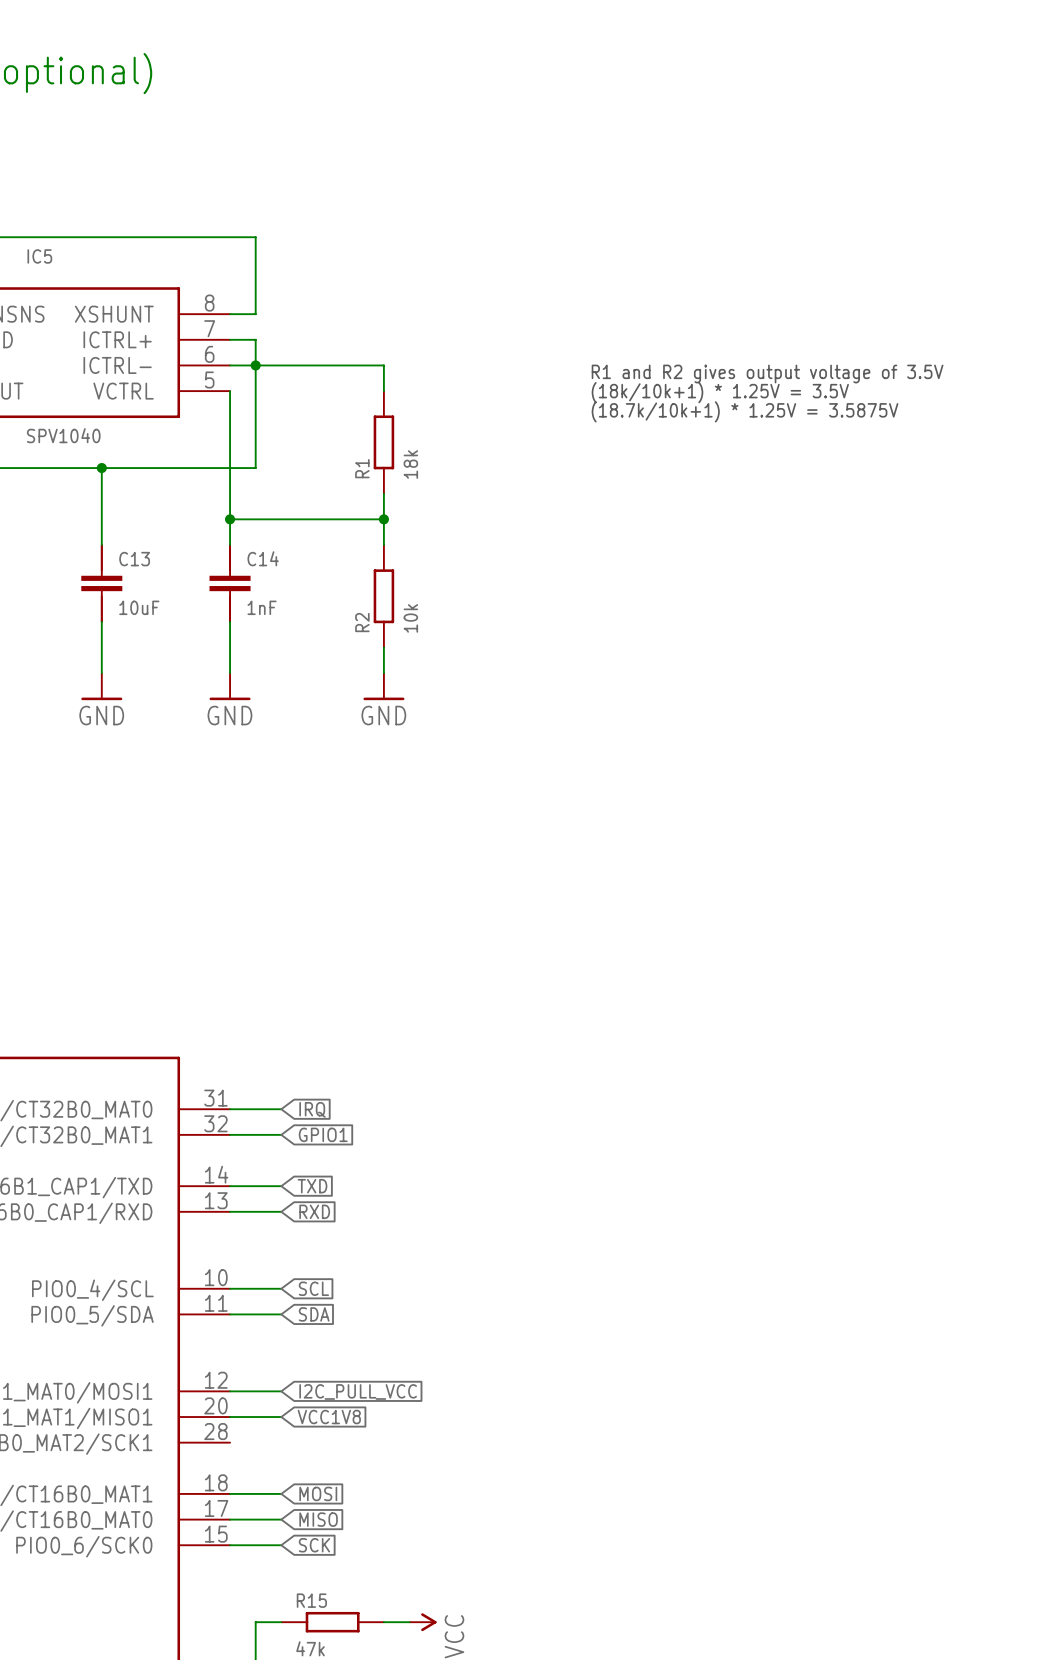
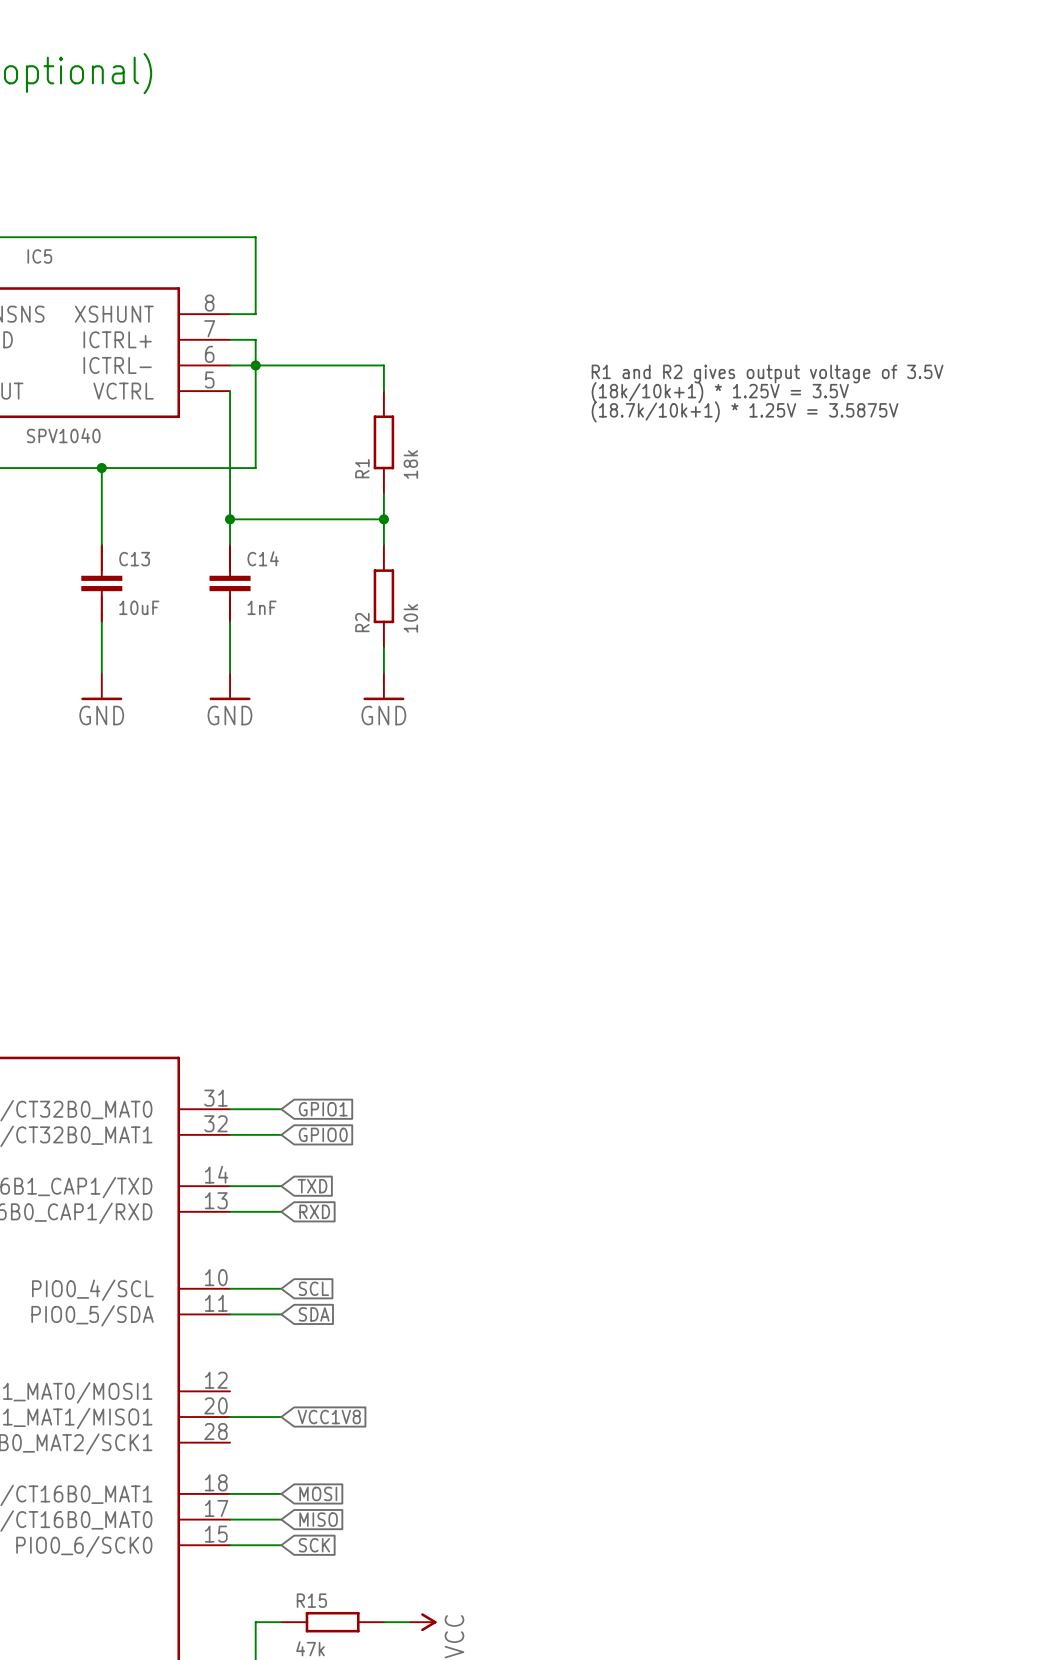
global label: IRQ (312, 1109) -> GPIO1 (323, 1109)
global label: GPIO1 (323, 1134) -> GPIO0 (323, 1134)
wire: (230, 1391) (281, 1391) -> none
global label: I2C_PULL_VCC (358, 1391) -> none

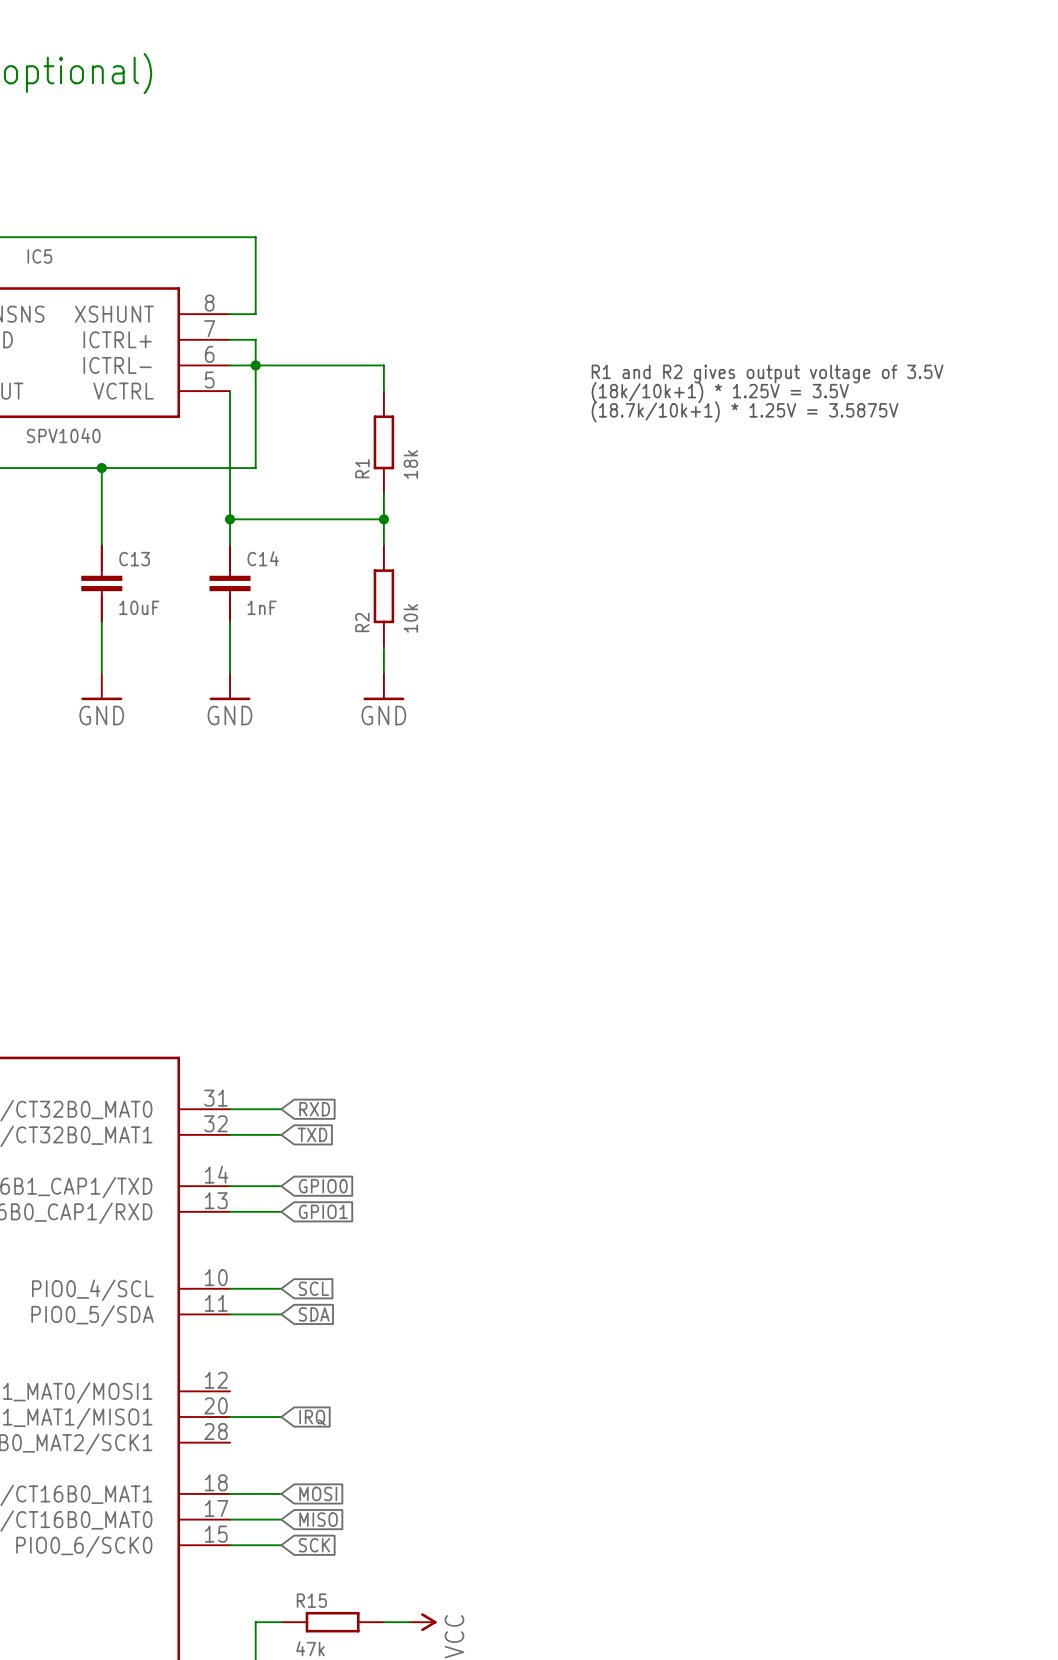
global label: GPIO1 (323, 1109) -> RXD (314, 1109)
global label: GPIO0 (323, 1134) -> TXD (312, 1134)
global label: TXD (312, 1186) -> GPIO0 (323, 1186)
global label: RXD (314, 1211) -> GPIO1 (323, 1211)
global label: VCC1V8 (329, 1417) -> IRQ (312, 1417)

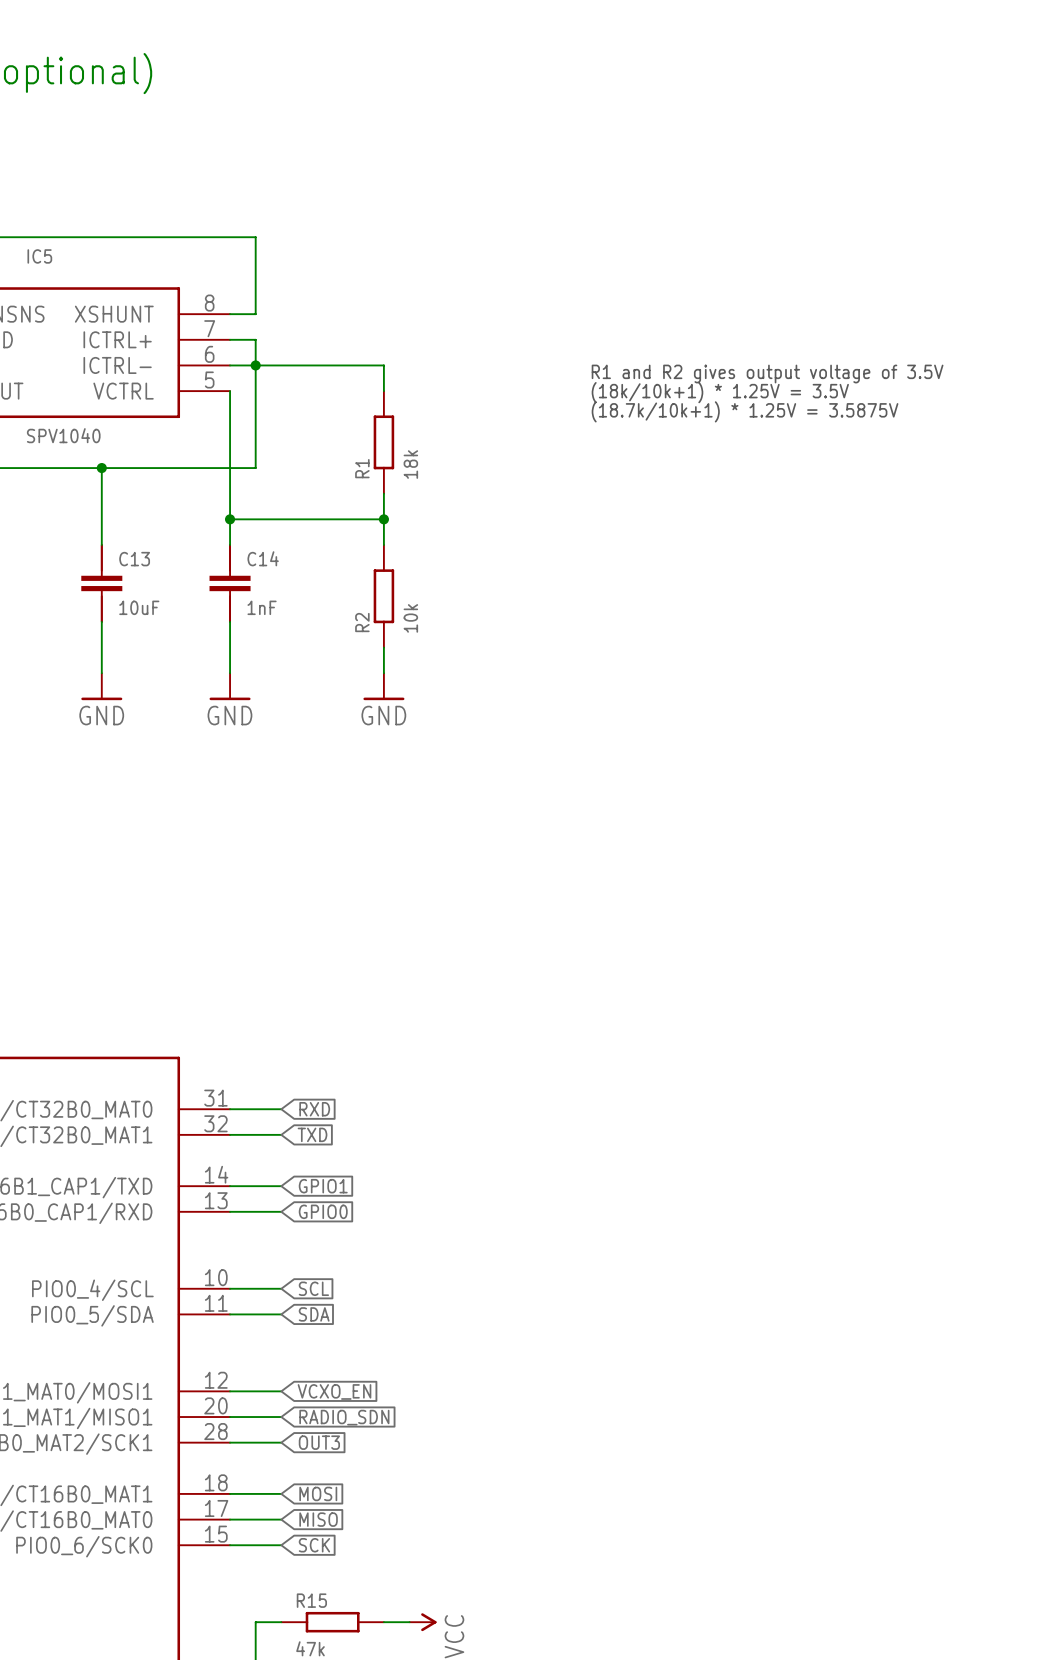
global label: GPIO0 (323, 1186) -> GPIO1 (323, 1186)
global label: GPIO1 (323, 1211) -> GPIO0 (323, 1211)
wire: none -> (230, 1391) (281, 1391)
global label: none -> VCXO_EN (334, 1391)
global label: IRQ (312, 1417) -> RADIO_SDN (344, 1417)
wire: none -> (230, 1442) (281, 1442)
global label: none -> OUT3 (319, 1442)

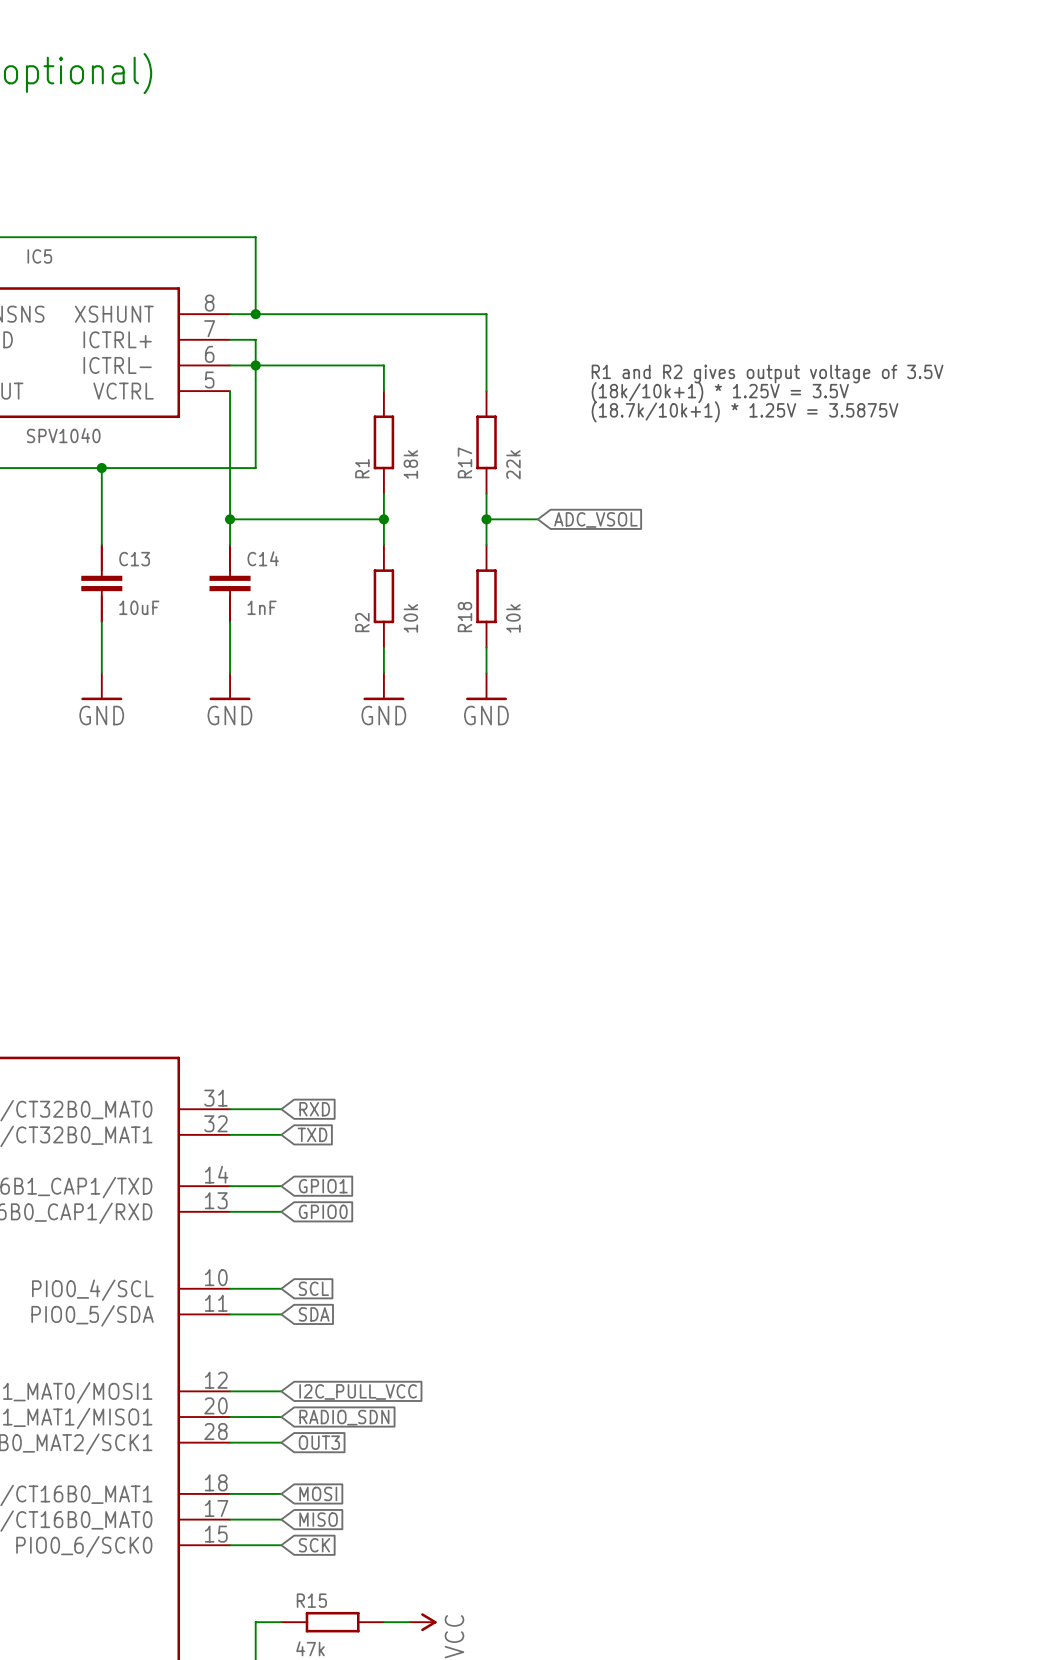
wire: none -> (255, 314) (486, 314) (486, 391)
junction: none -> (255, 314)
R17: none -> 22k (486, 442)
wire: none -> (486, 493) (486, 544)
wire: none -> (486, 519) (537, 519)
junction: none -> (486, 519)
global label: none -> ADC_VSOL (595, 519)
R18: none -> 10k (486, 596)
wire: none -> (486, 647) (486, 673)
power symbol: none -> GND (486, 686)
global label: VCXO_EN (334, 1391) -> I2C_PULL_VCC (358, 1391)

